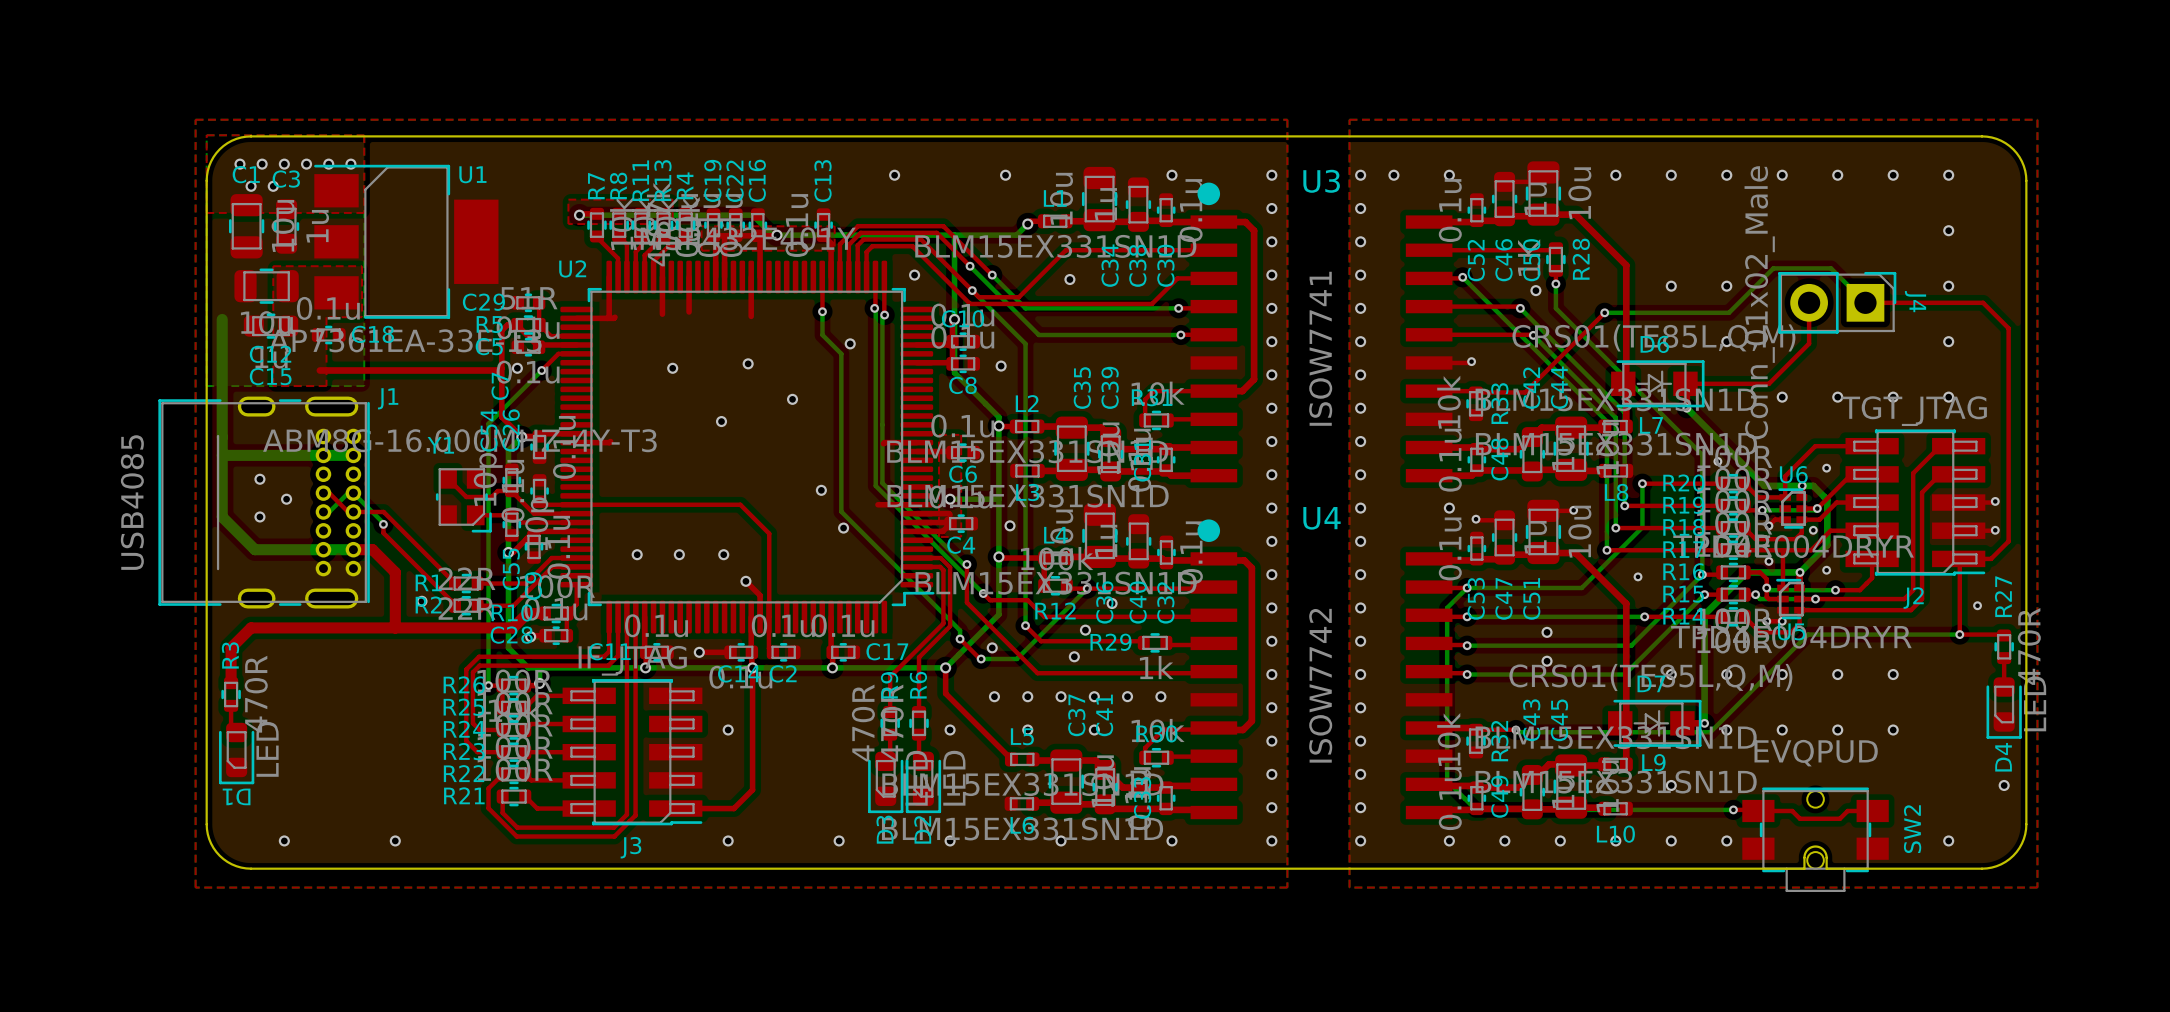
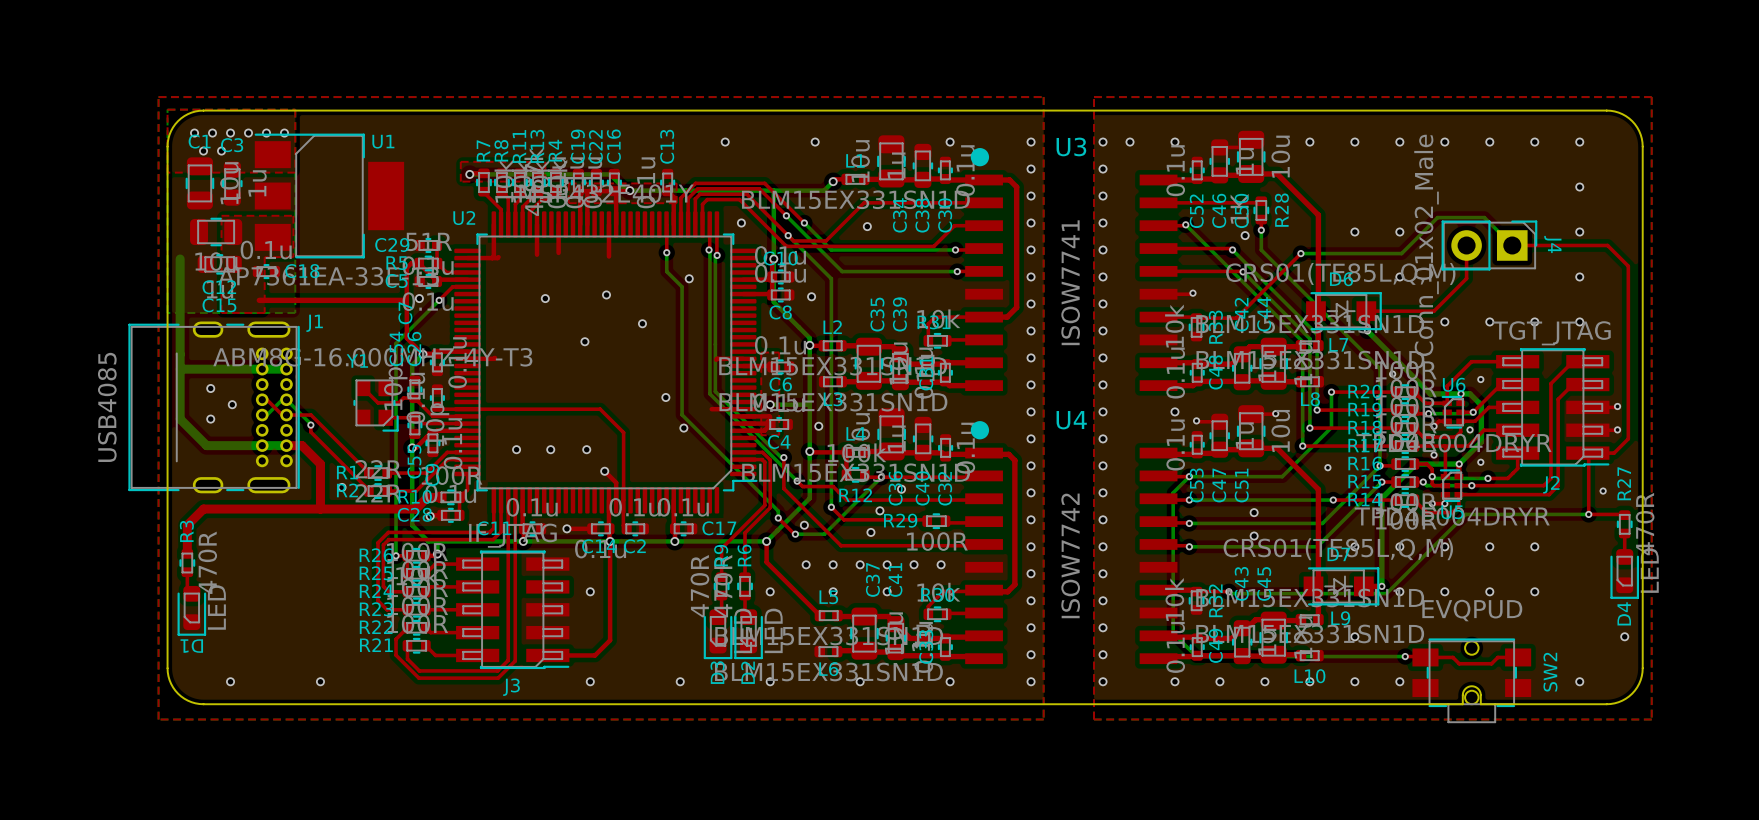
R29 value: 1k (1156, 667) -> 100R (937, 541)

